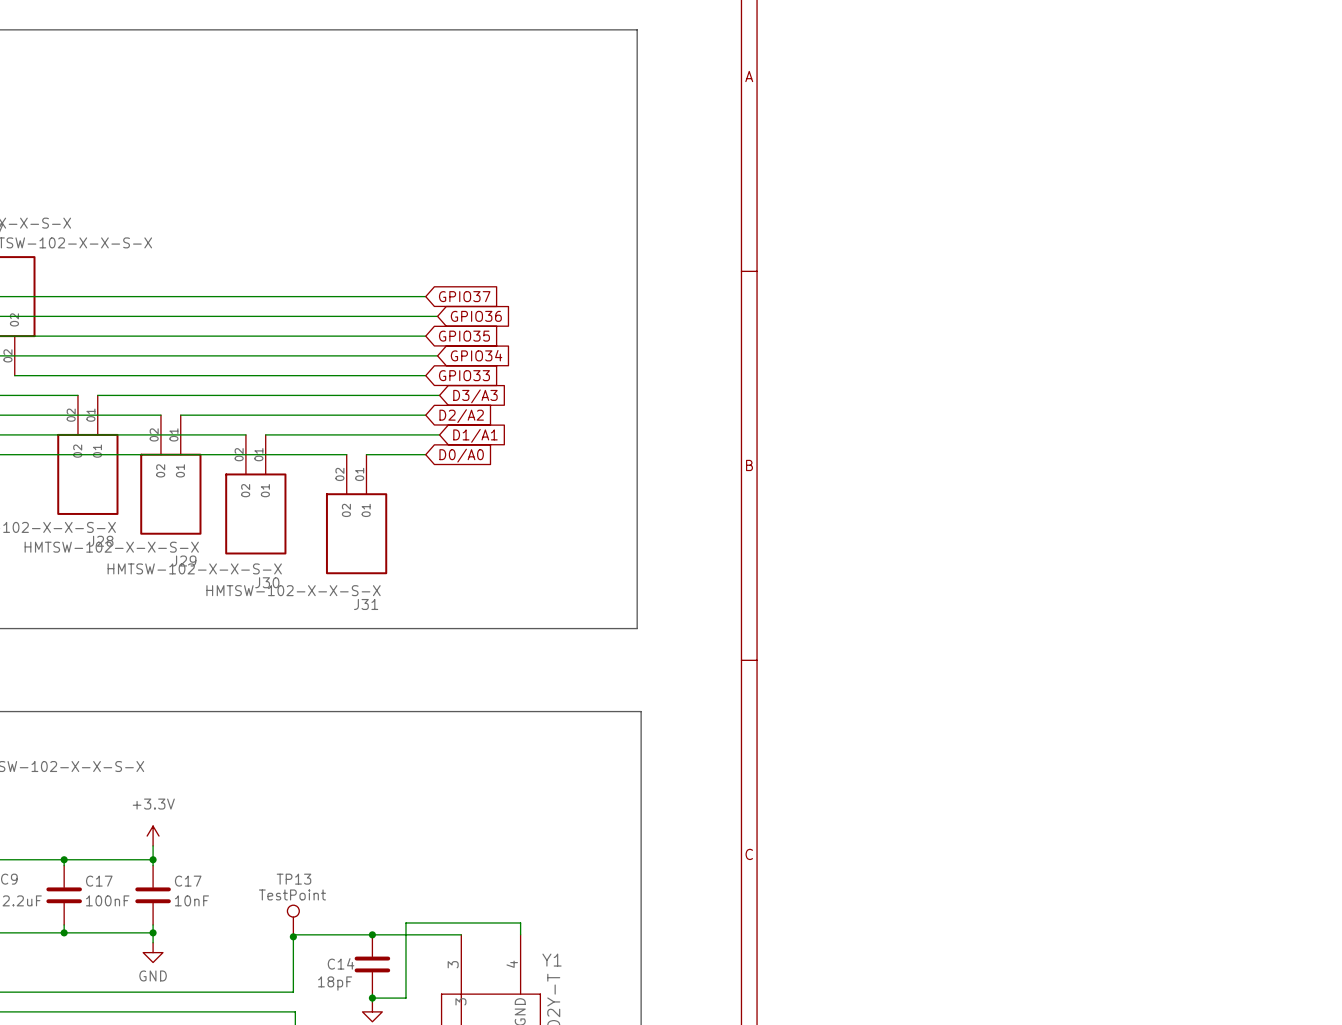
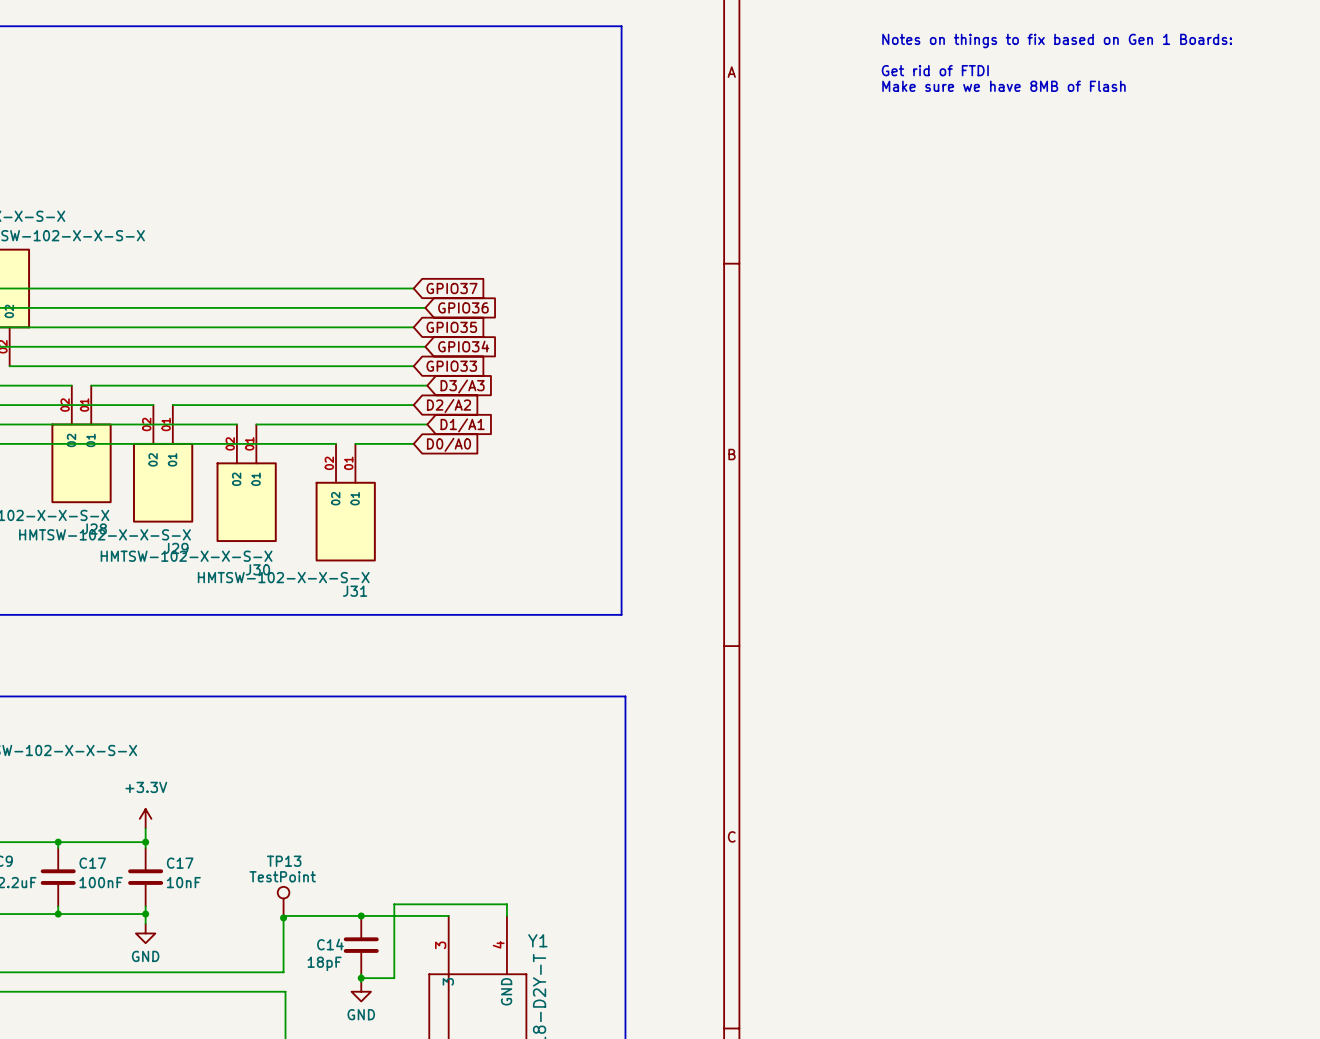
text: none -> Notes on things to fix based on Gen 1 Boards: (1057, 40)
text: none -> Get rid of FTDI (935, 70)
text: none -> Make sure we have 8MB of Flash (1003, 86)

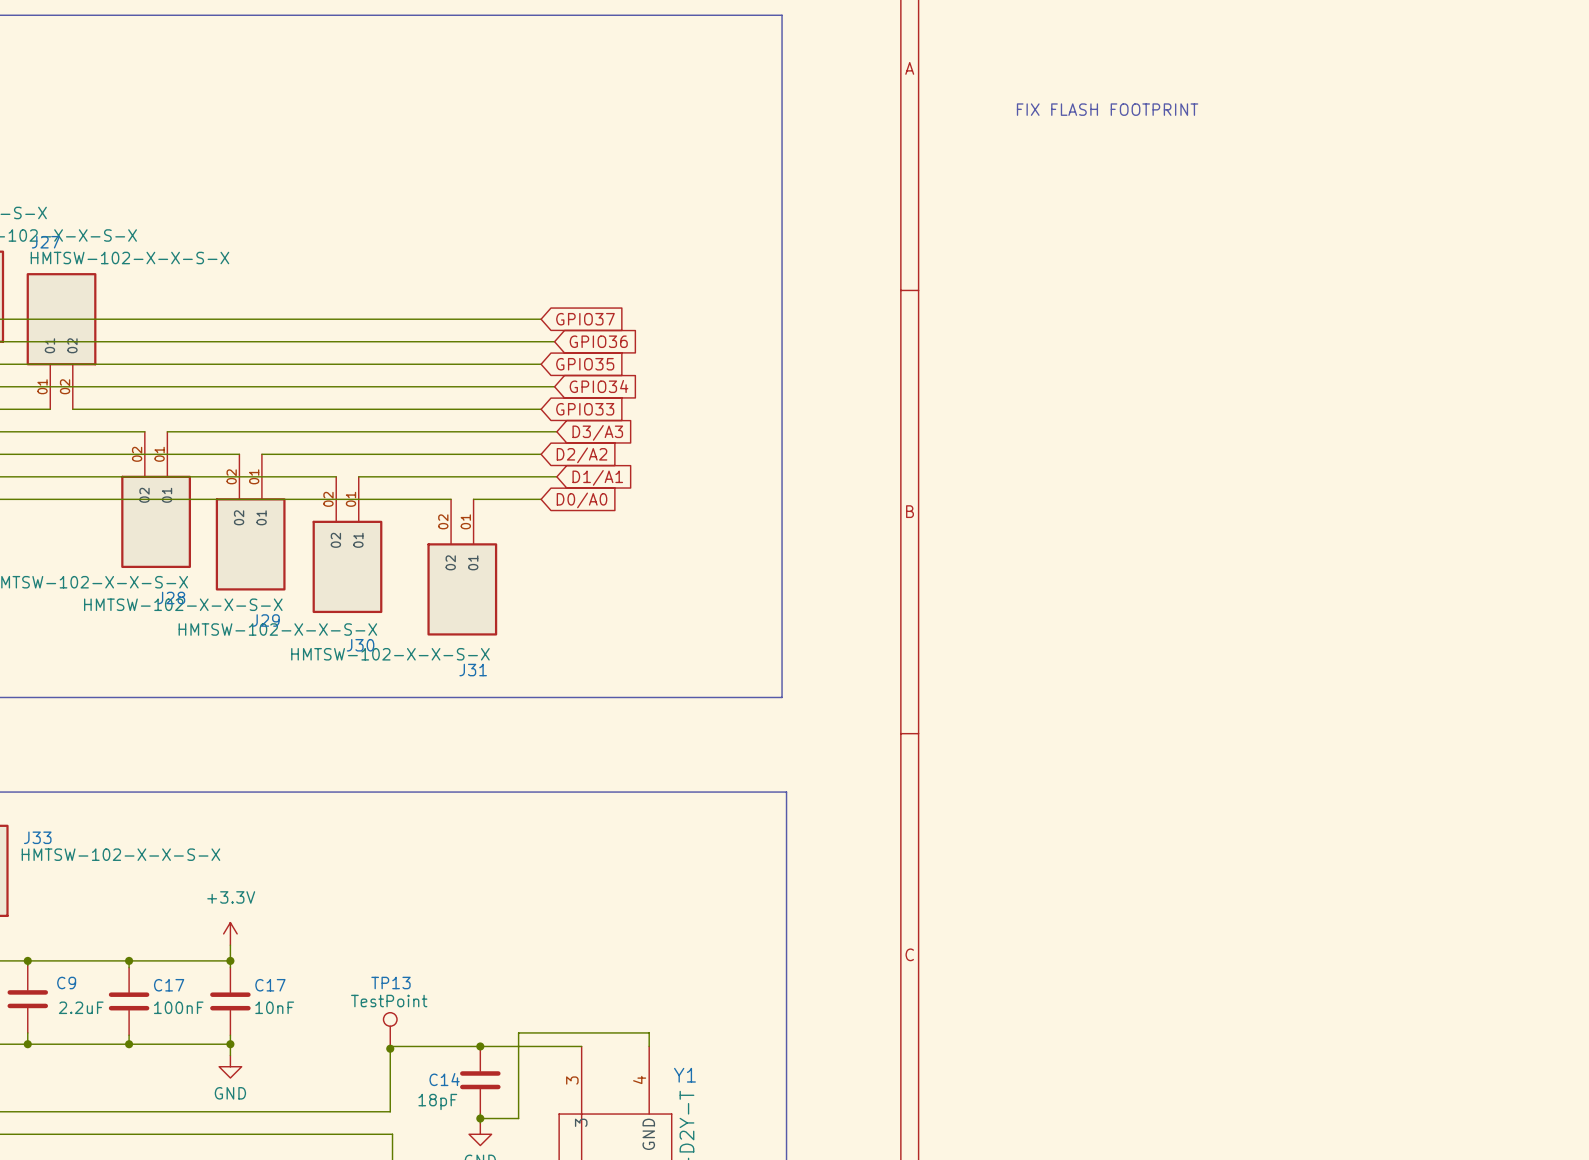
text: Notes on things to fix based on Gen 1 Boards: (1057, 40) -> none
text: Get rid of FTDI (935, 70) -> none
text: Make sure we have 8MB of Flash (1003, 86) -> none
text: none -> FIX FLASH FOOTPRINT (1107, 109)

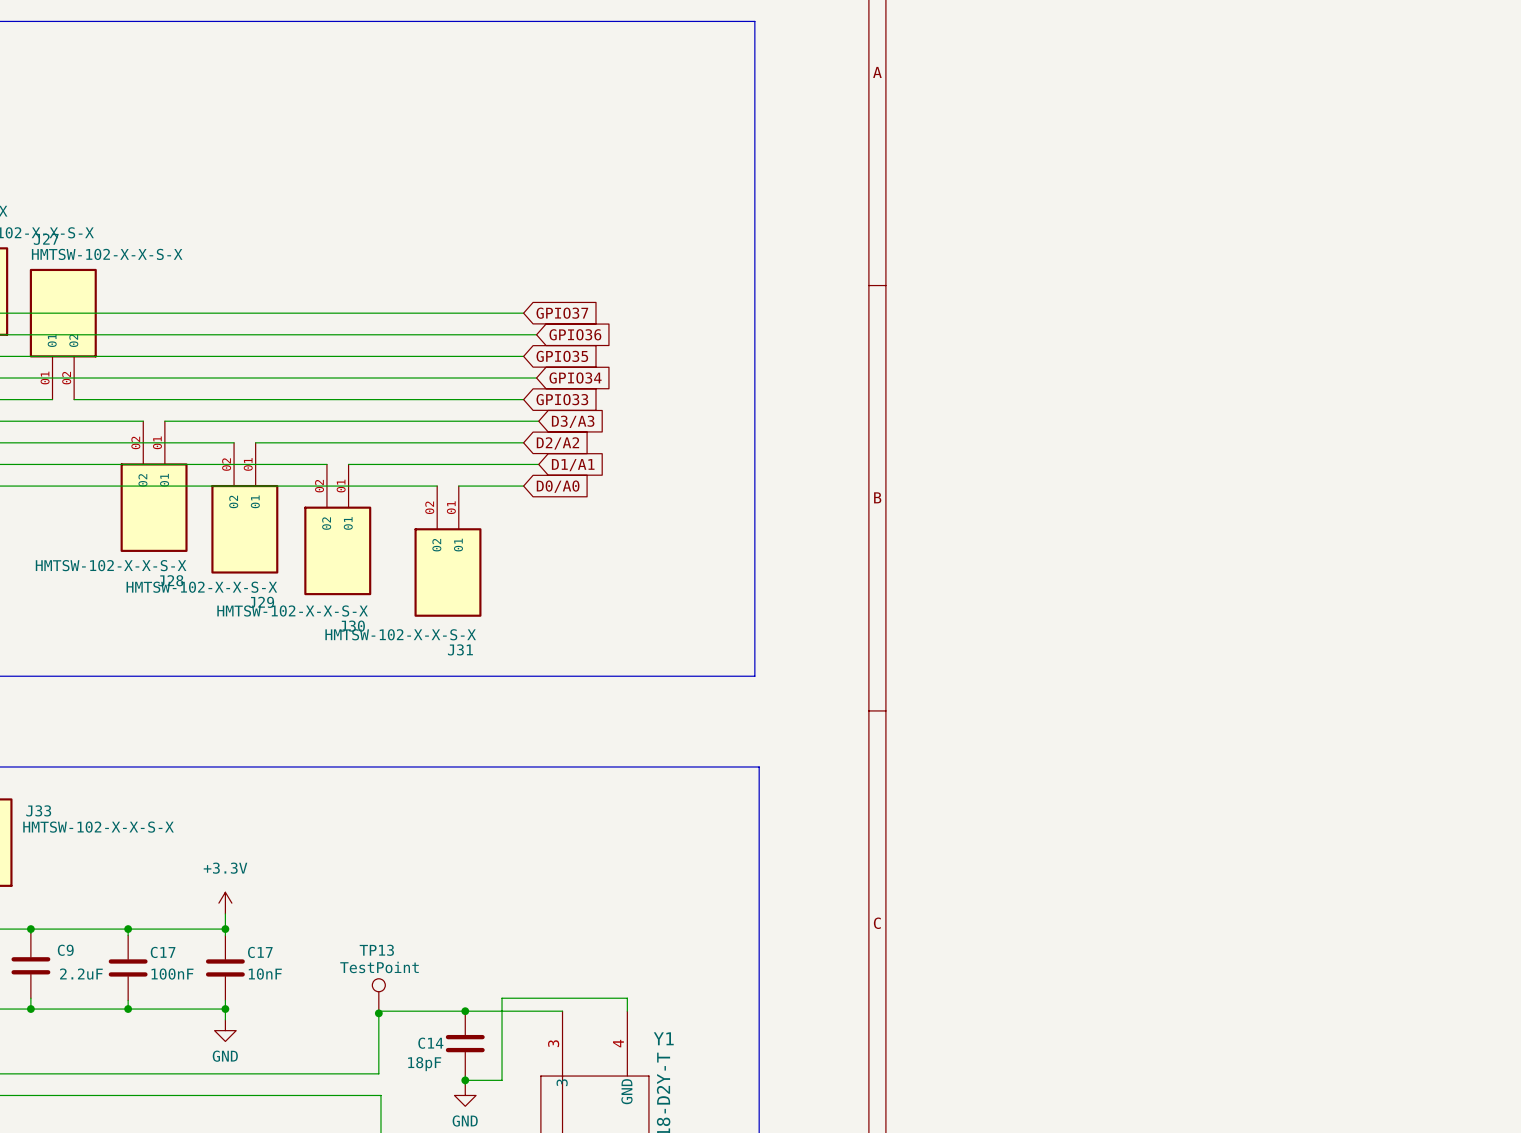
text: FIX FLASH FOOTPRINT (1107, 109) -> none

